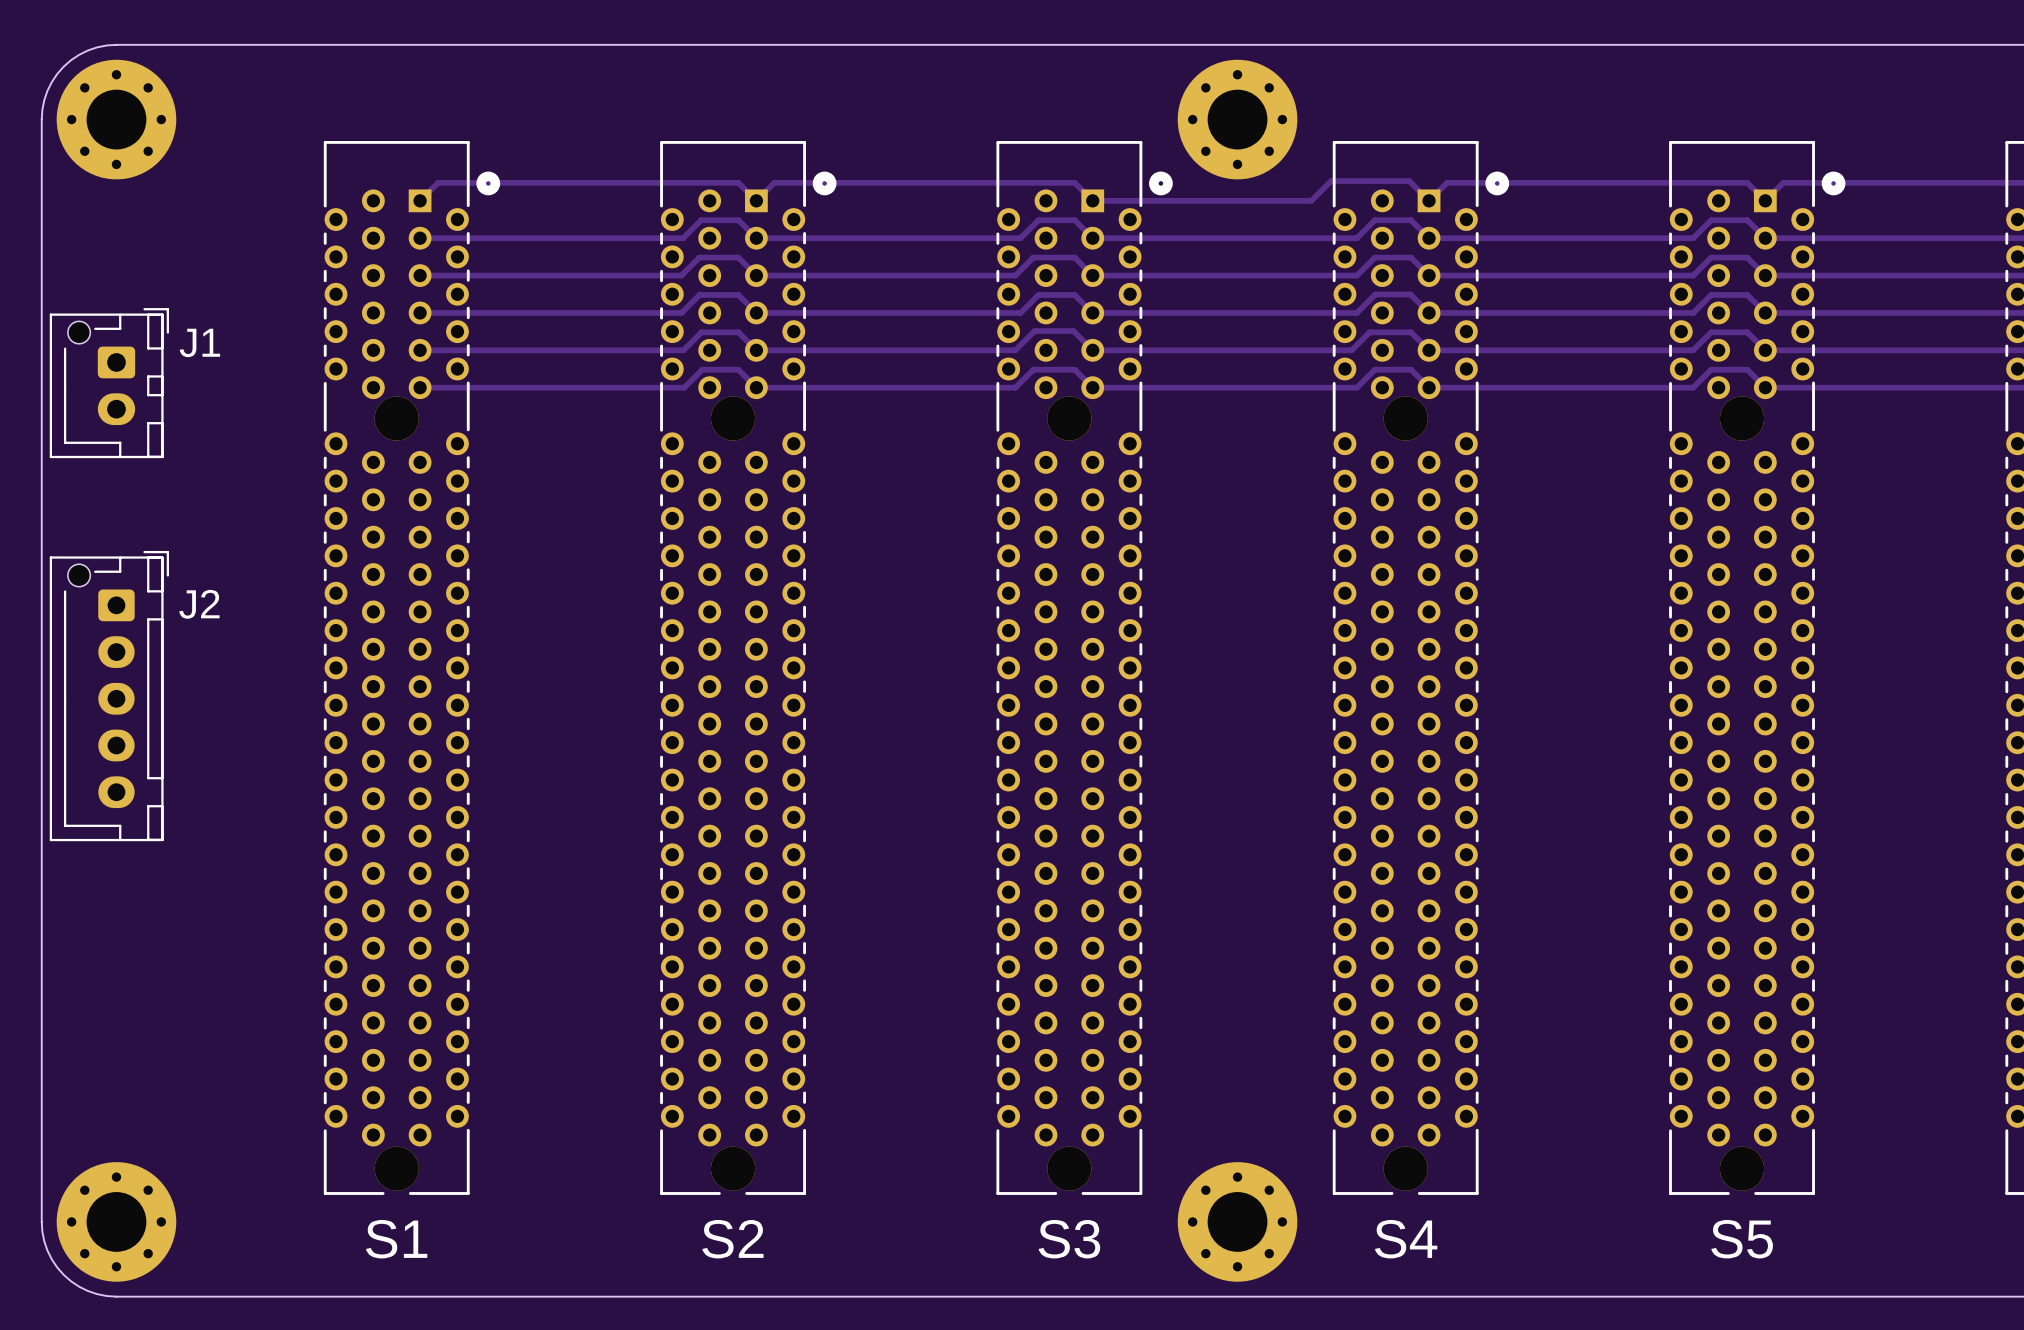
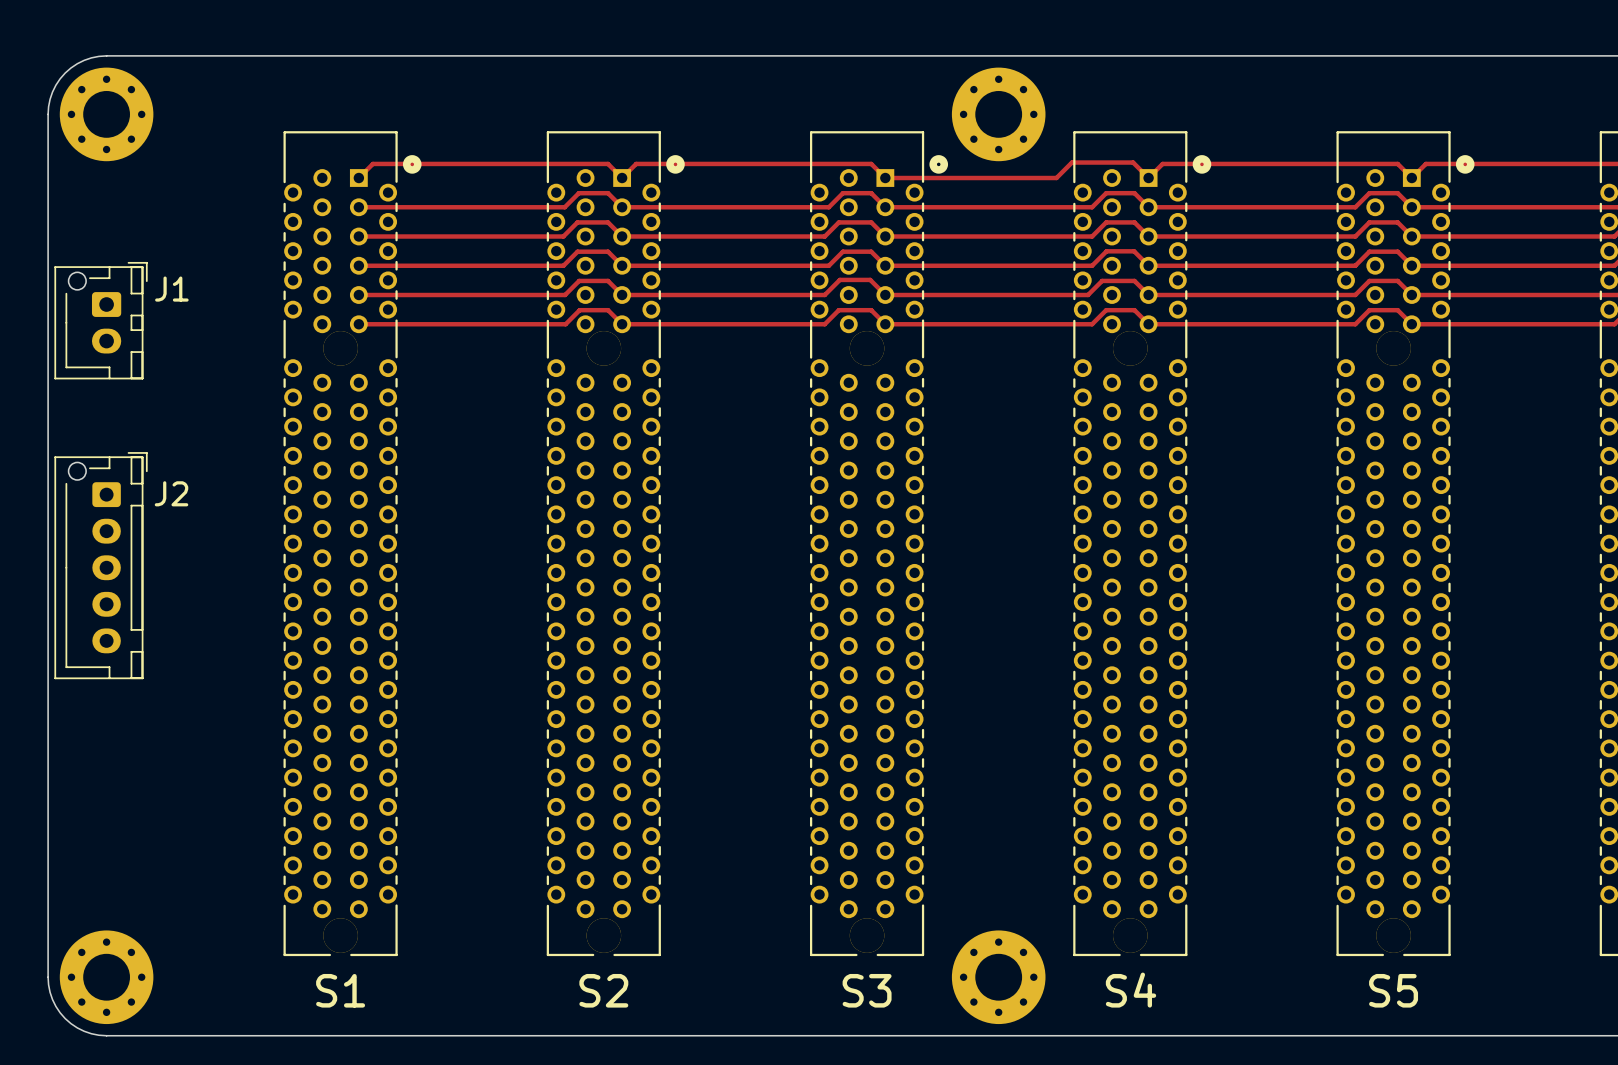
board edge: (116, 44) (87, 50) (63, 66) (47, 90) (41, 119) (41, 1221) (47, 1250) (63, 1274) (87, 1290) (116, 1296) -> (121, 55) (91, 57) (70, 67) (55, 85) (50, 99) (48, 114) (48, 984) (55, 1006) (70, 1023) (91, 1033) (121, 1035)
part position: (116, 119) -> (106, 114)
J1 position: (109, 383) -> (101, 320)
J2 position: (109, 696) -> (101, 565)
part position: (116, 1221) -> (106, 977)

